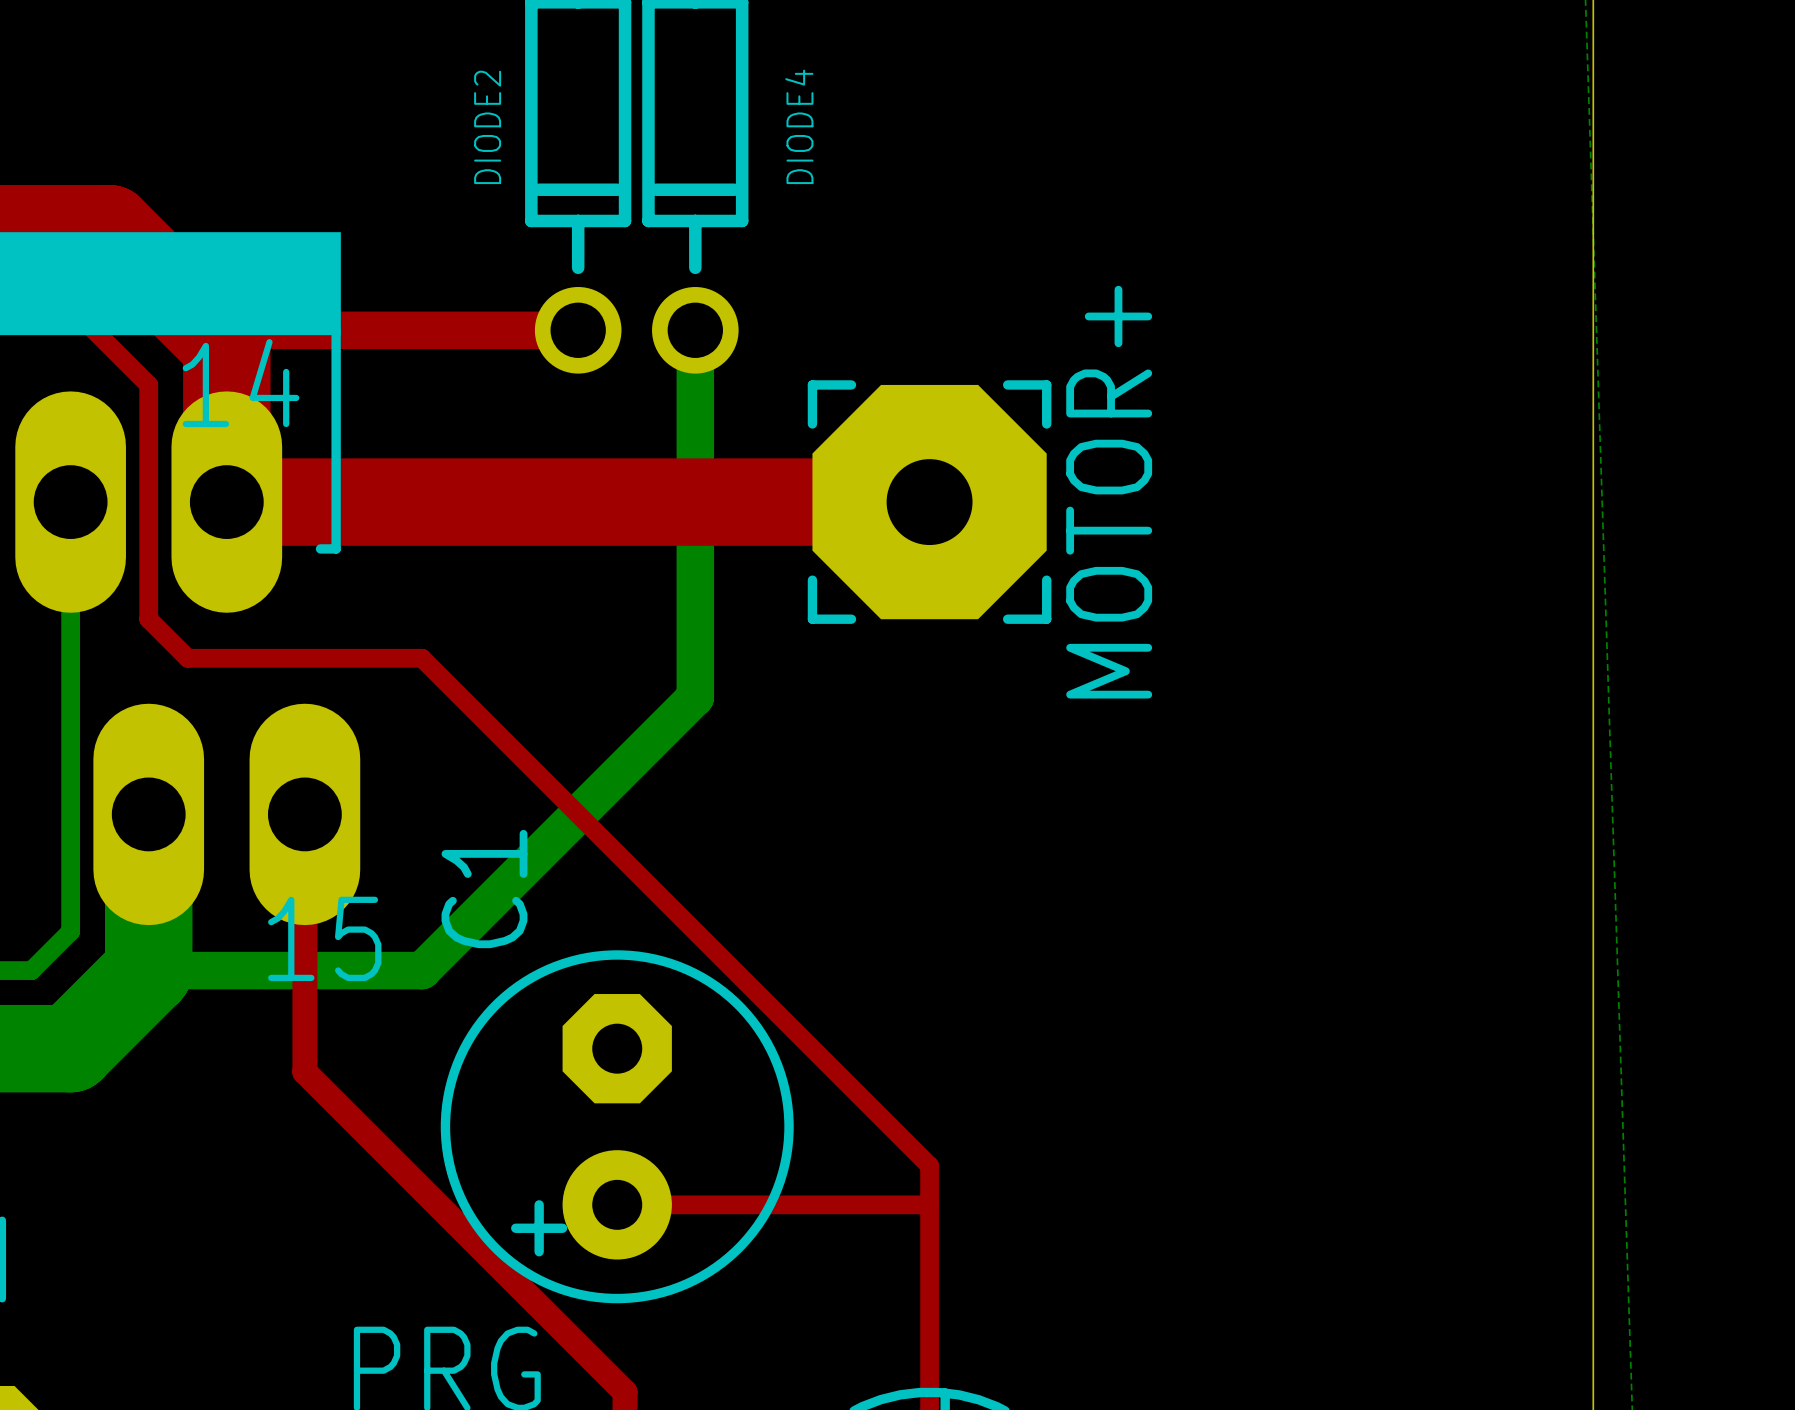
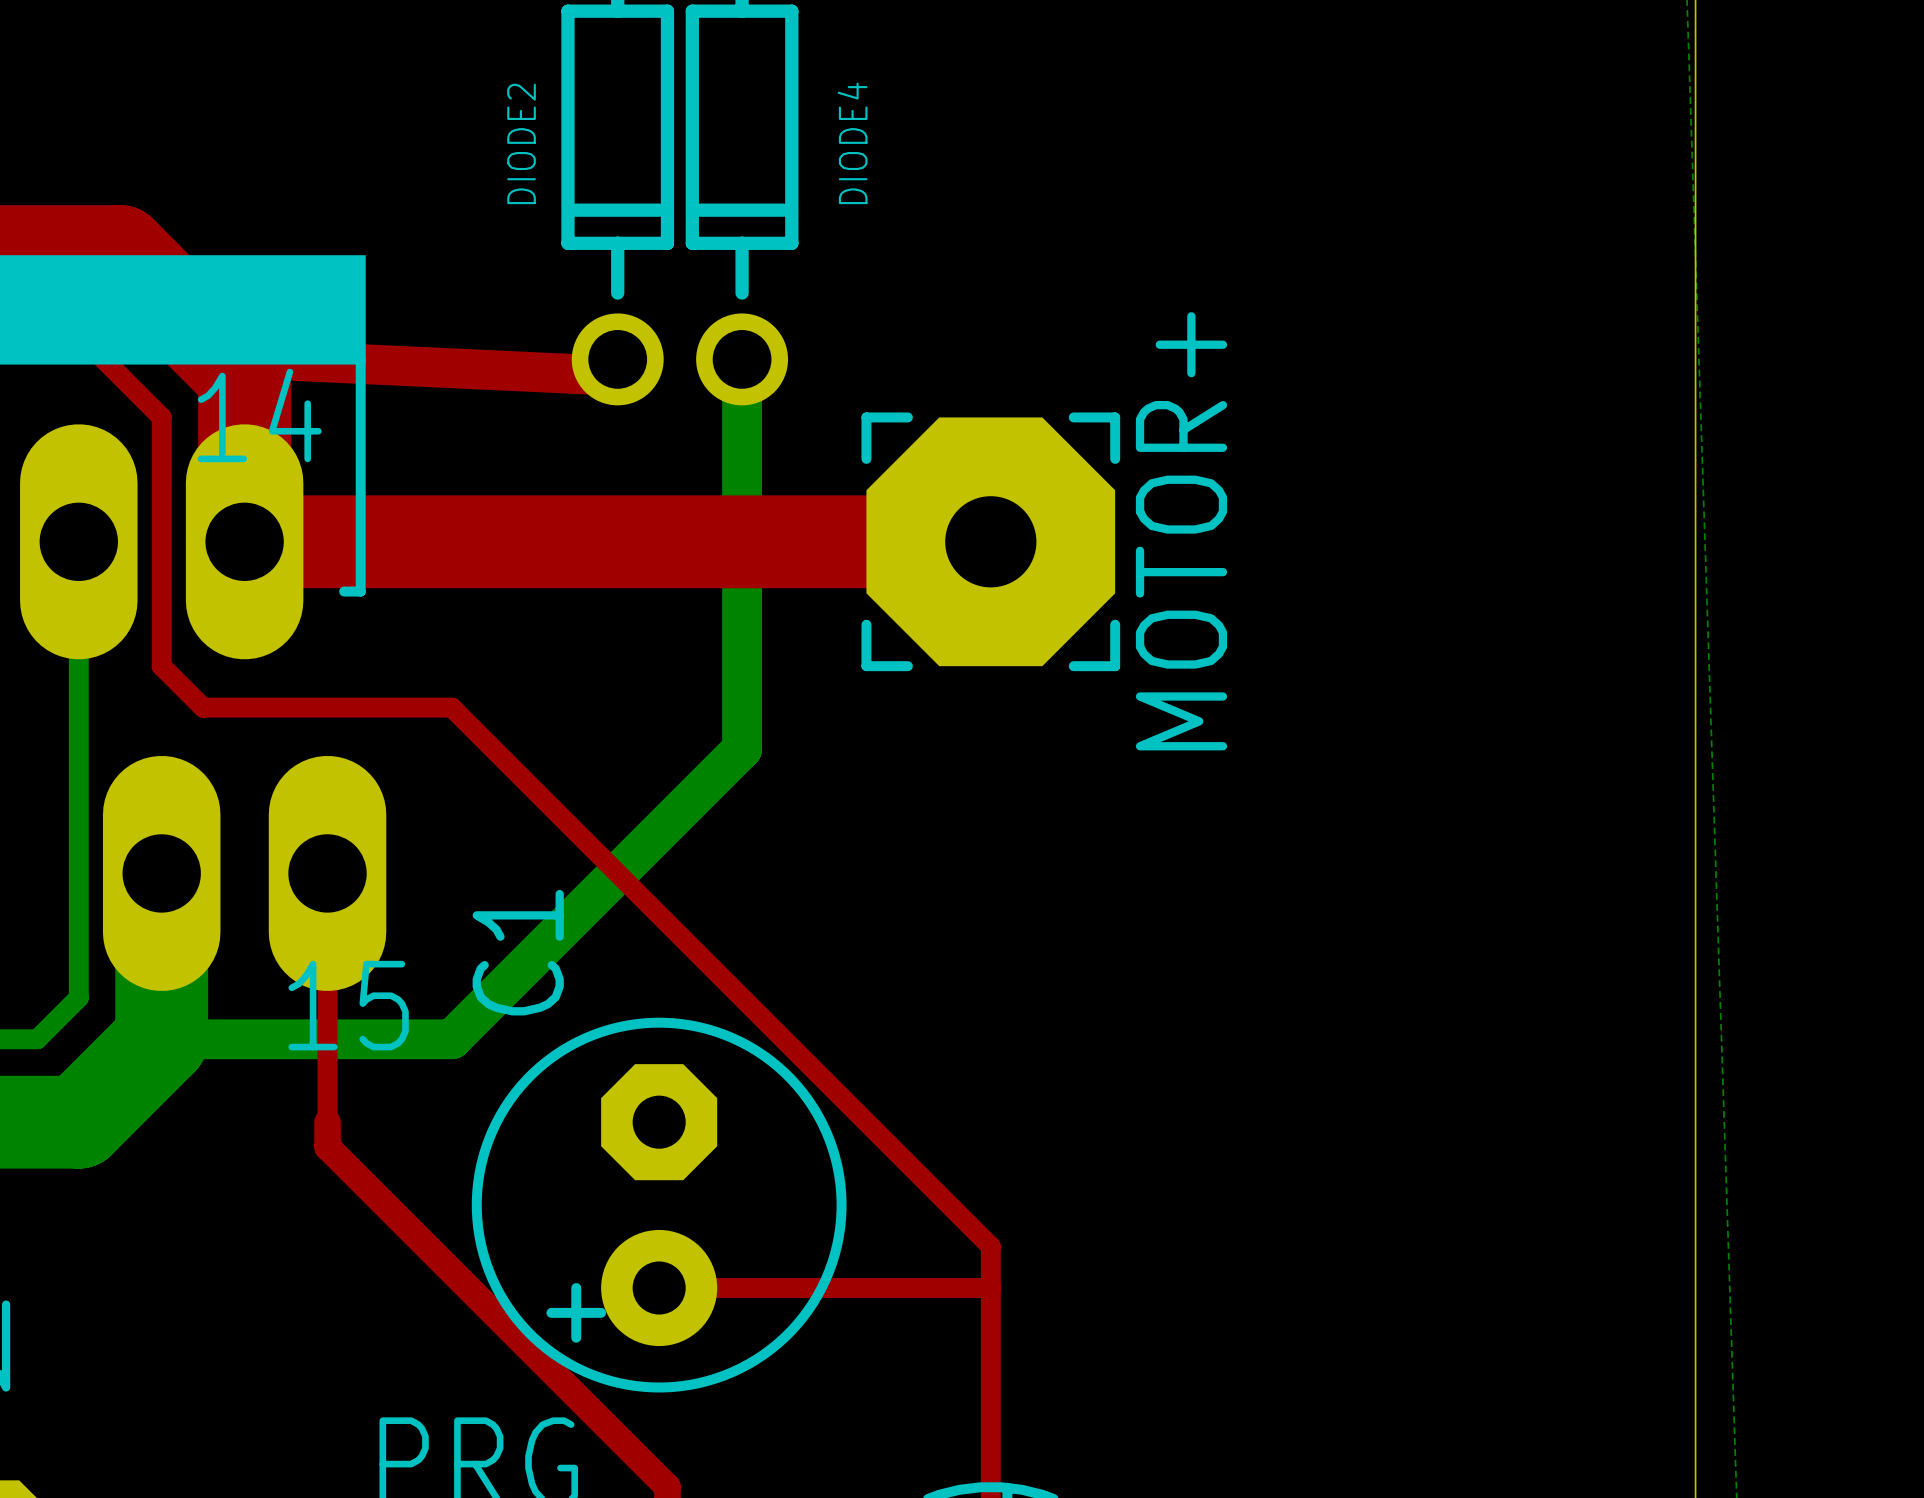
top track: (242, 330) (578, 330) -> (261, 359) (617, 375)
top track width: thick (304, 814) (304, 1048) -> thin (327, 873) (327, 1122)

